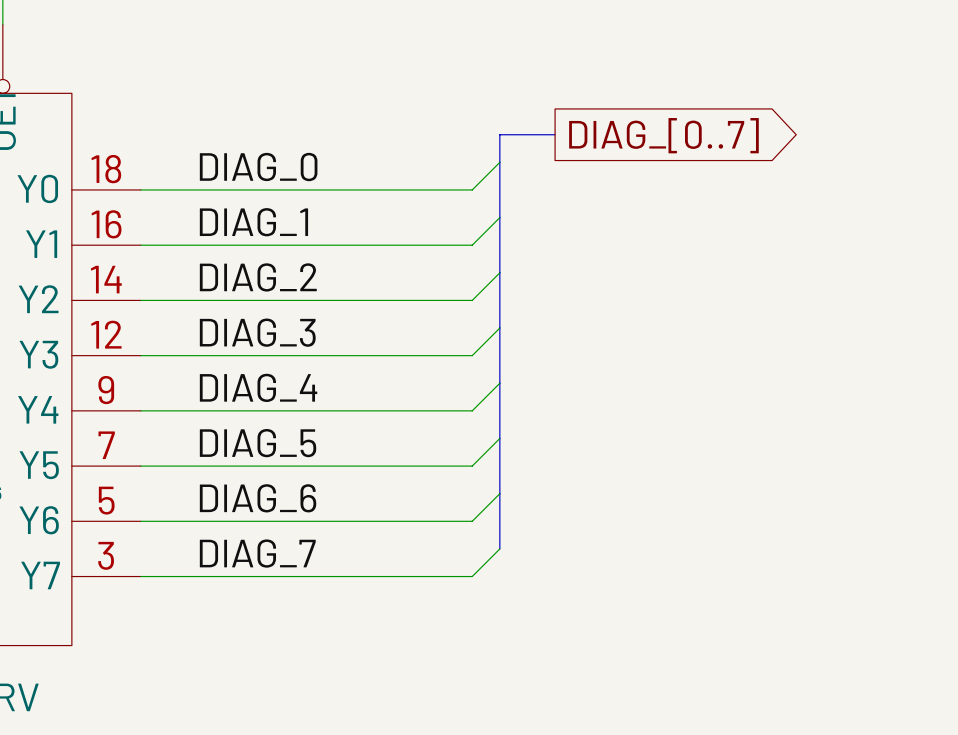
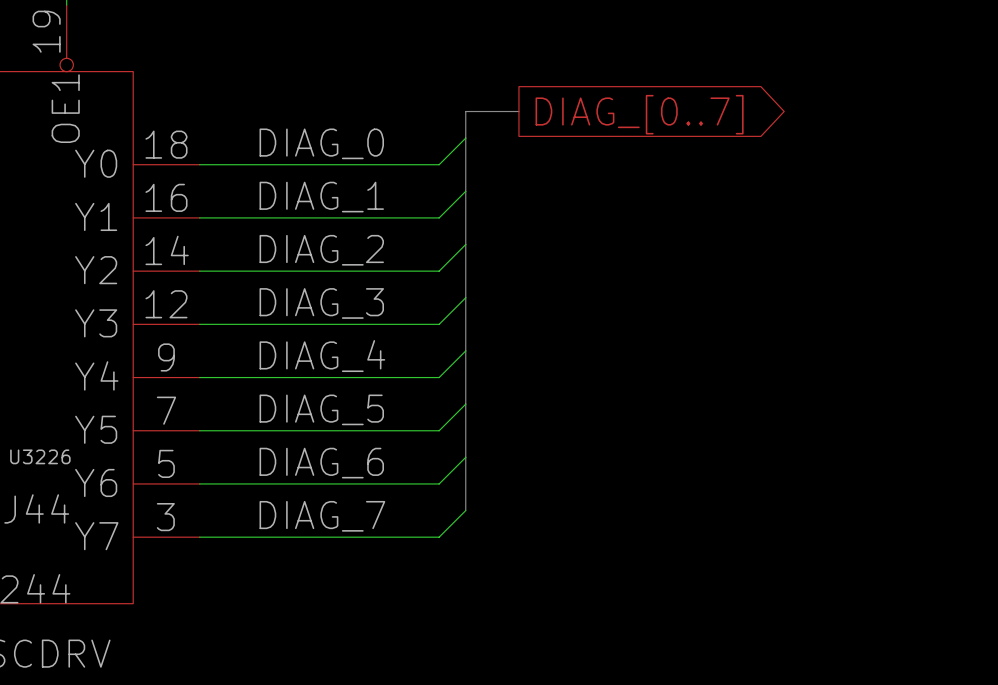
bus: (555, 134) (499, 134) (499, 548) -> (518, 111) (465, 111) (465, 510)
global label position: DIAG_[0..7] (663, 135) -> DIAG_[0..7] (639, 114)
wire: (499, 162) (472, 189) (389, 189) -> (465, 138) (439, 164)
wire: (499, 217) (472, 245) (389, 245) -> (465, 191) (439, 217)
wire: (499, 272) (472, 300) (389, 300) -> (465, 244) (439, 271)
wire: (499, 328) (472, 355) (389, 355) -> (465, 297) (439, 324)
wire: (499, 383) (472, 410) (389, 410) -> (465, 350) (439, 377)
wire: (499, 438) (472, 466) (389, 466) -> (465, 404) (439, 430)
wire: (499, 493) (472, 521) (389, 521) -> (465, 457) (439, 483)
wire: (499, 548) (472, 576) (389, 576) -> (465, 510) (439, 537)

